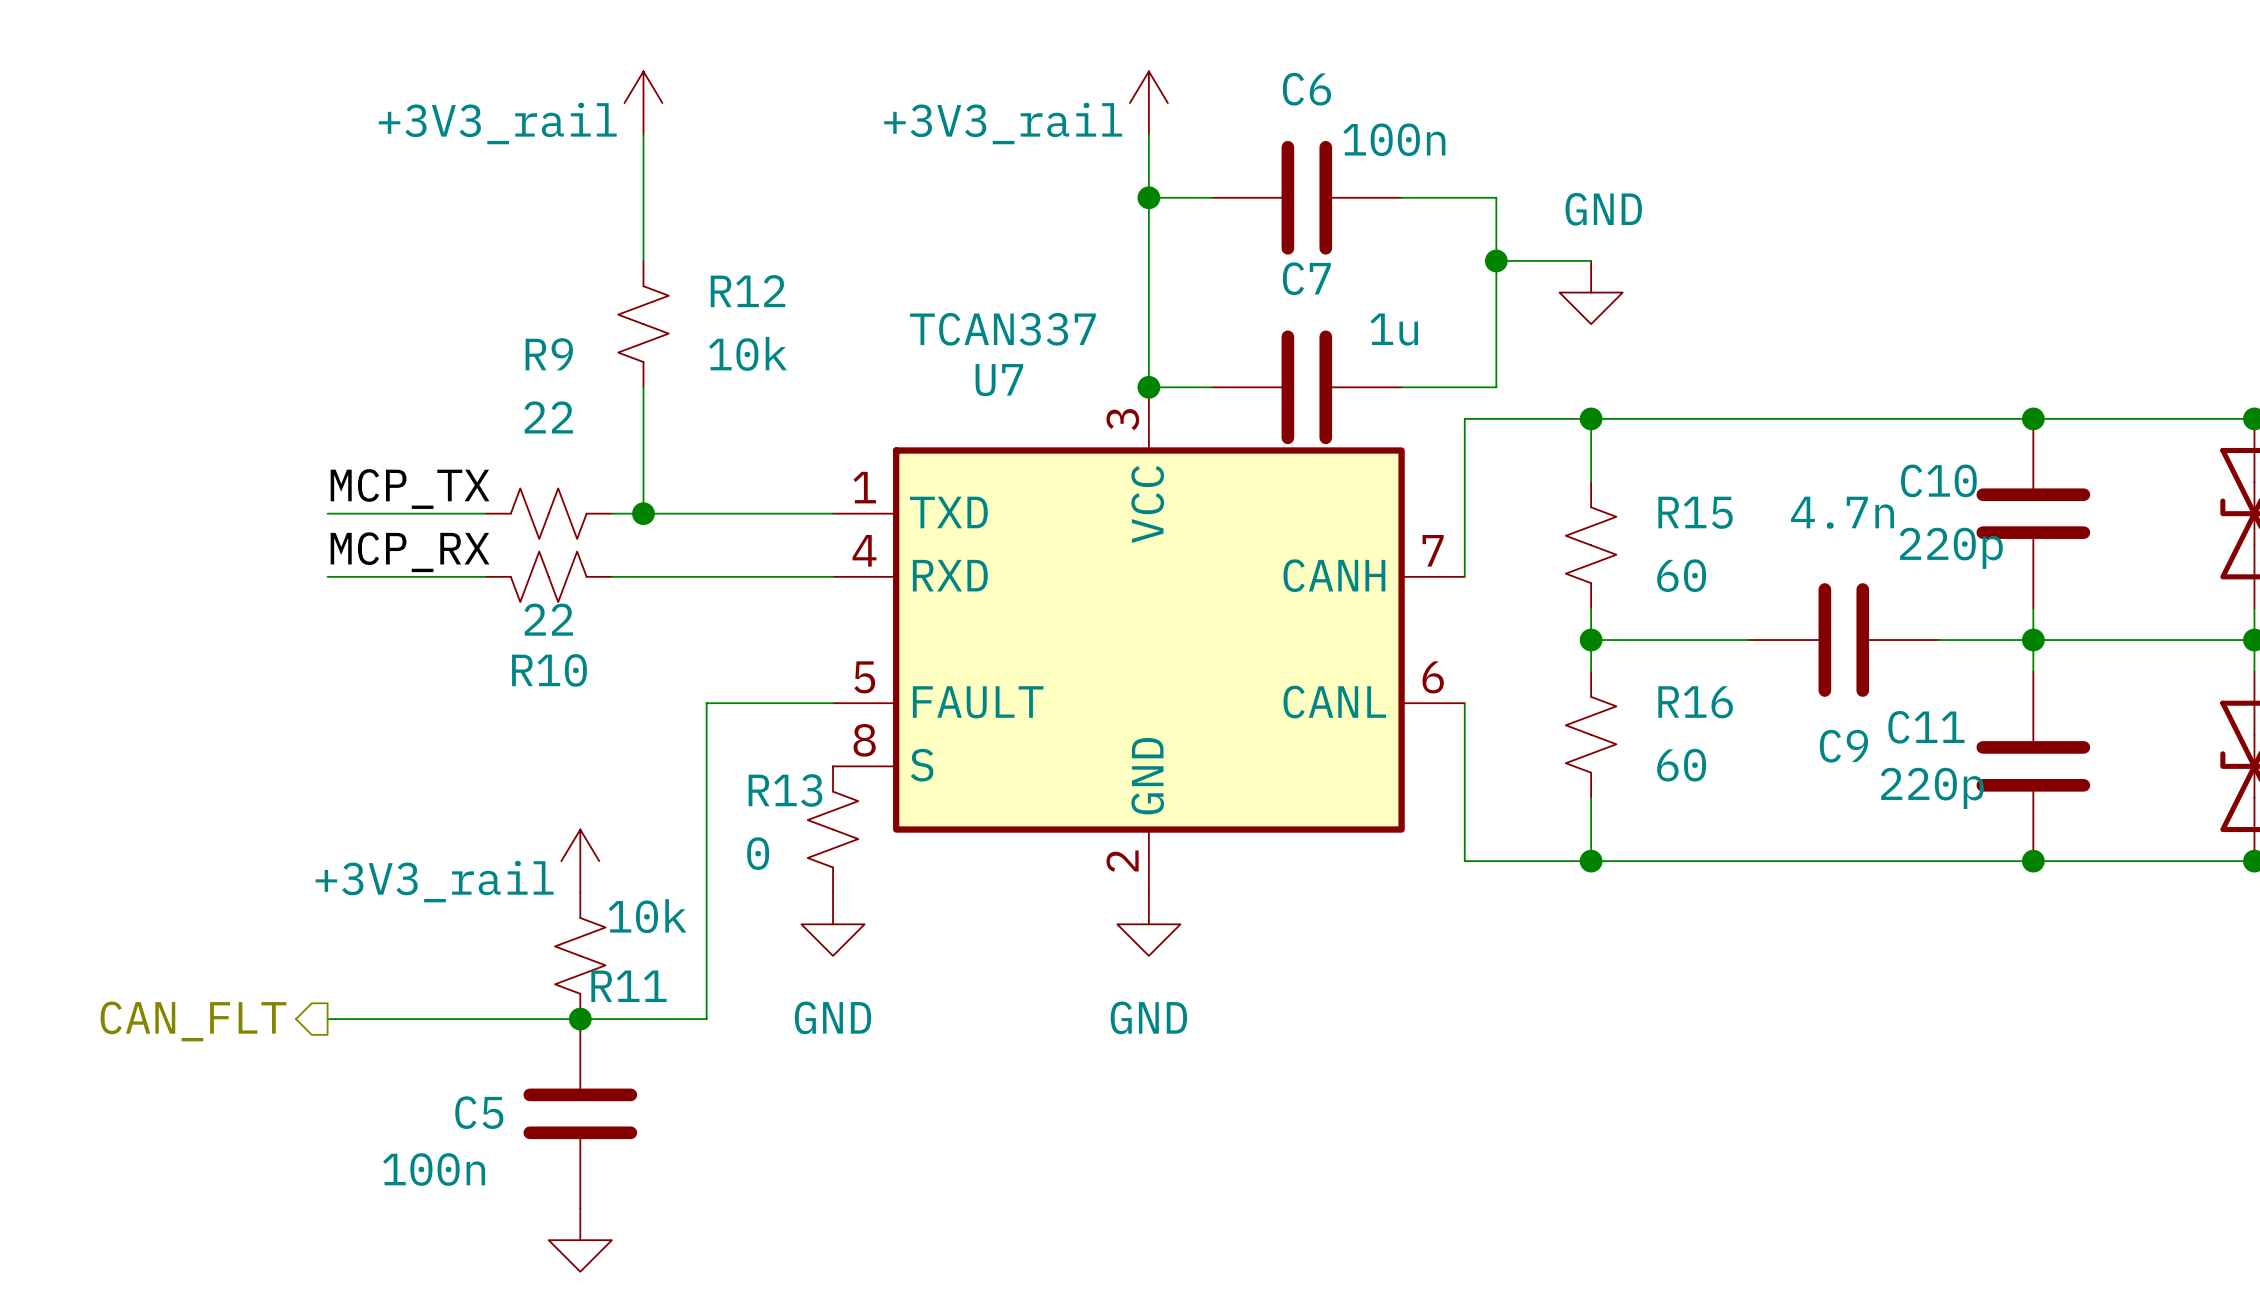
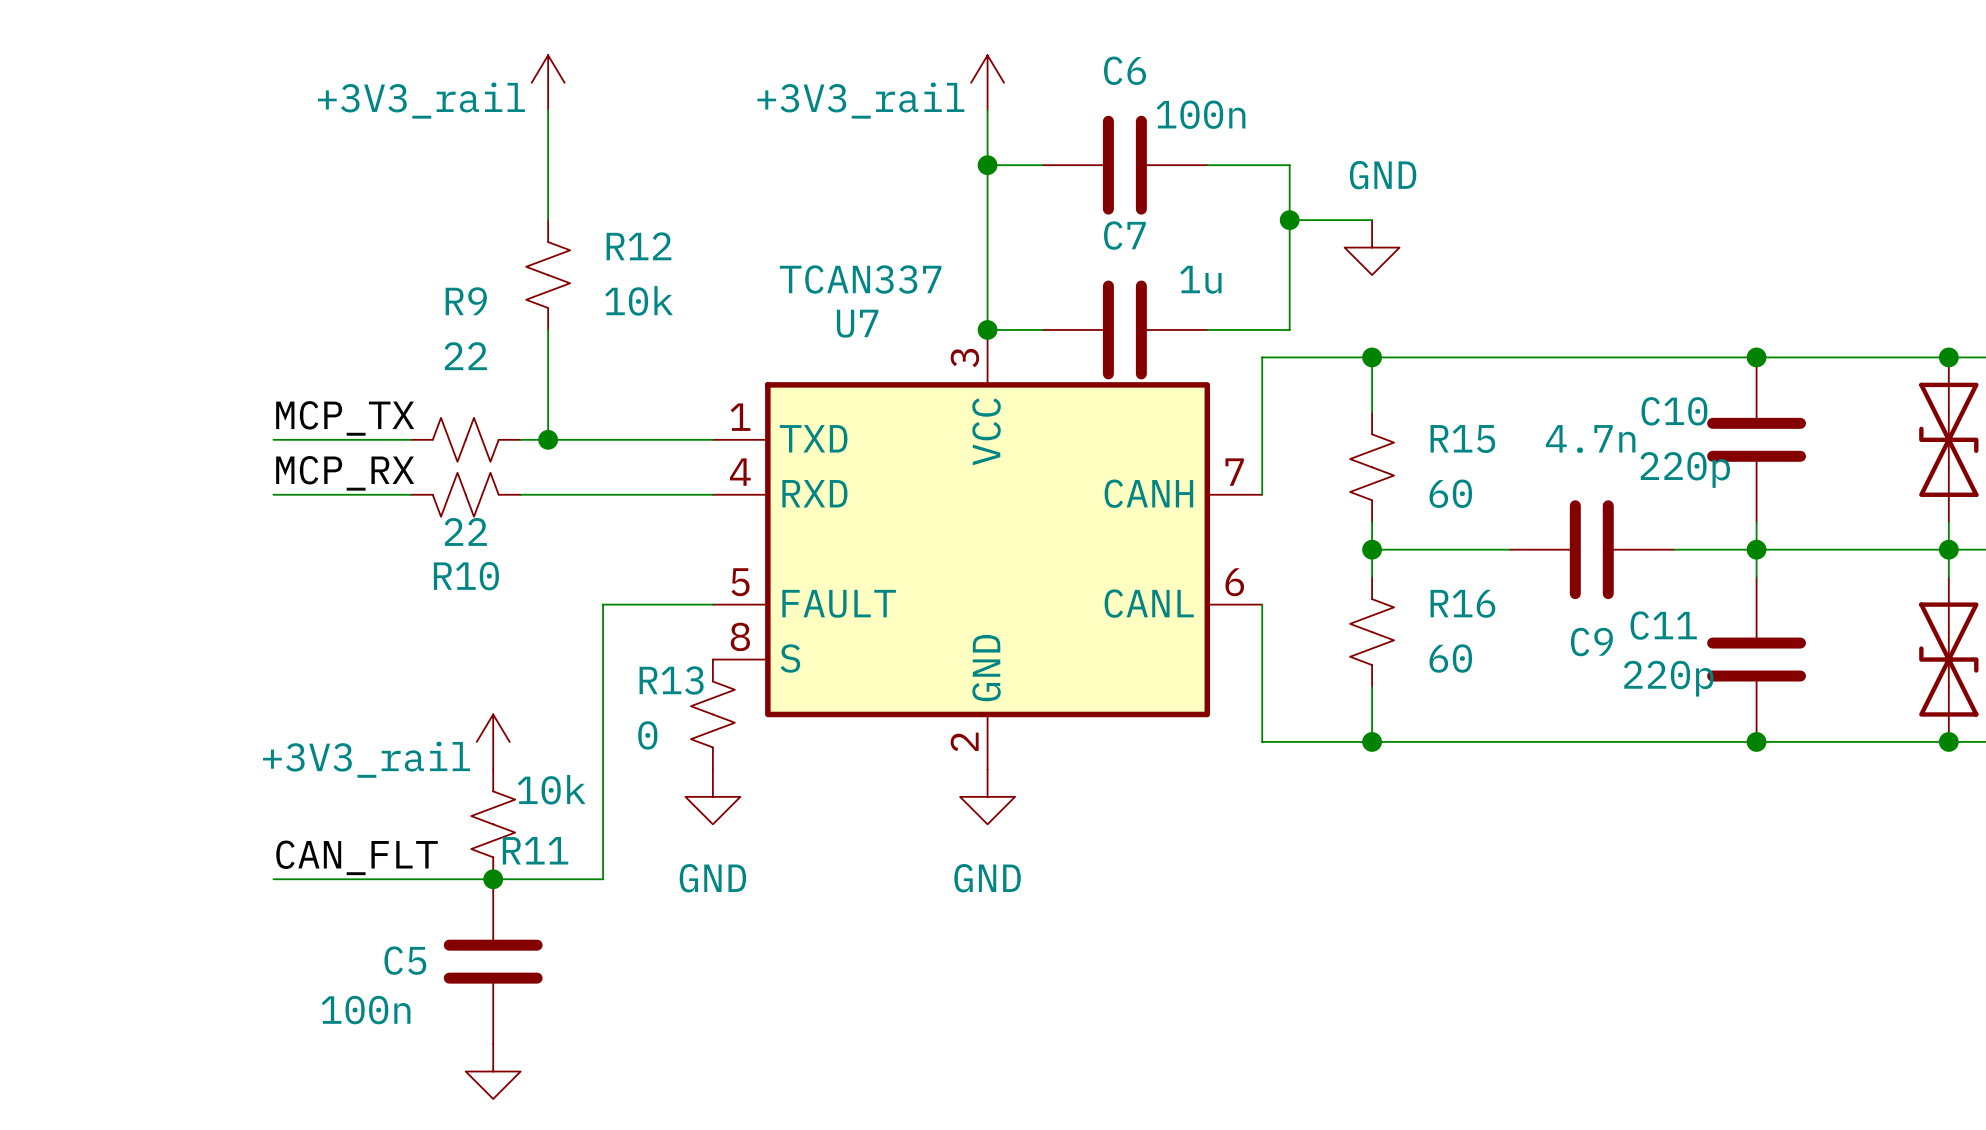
label: none -> CAN_FLT (357, 857)
hierarchical label: CAN_FLT (193, 1021) -> none

